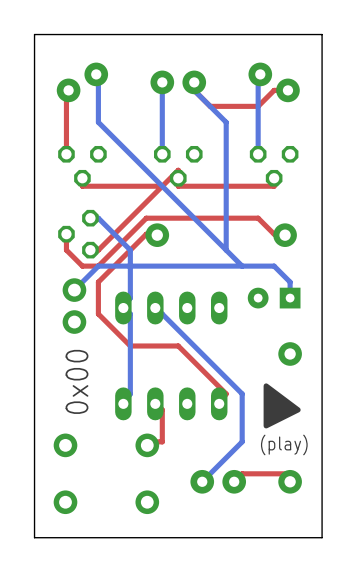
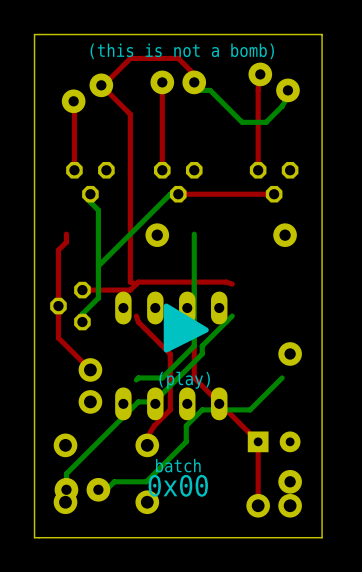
text: none -> (this is not a bomb) (182, 51)
bottom track: (96, 74) (98, 74) (98, 122) (242, 266) -> none
bottom track: (260, 74) (258, 74) (258, 154) -> none
part position: (82, 82) -> (87, 93)
bottom track: (162, 82) (162, 154) -> none
top track: none -> (194, 82) (194, 74) (178, 58) (130, 58) (101, 85) (130, 114) (130, 282) (136, 284)
bottom track: (194, 82) (194, 90) (226, 122) (226, 250) -> none
top track: none -> (258, 83) (258, 170)
top track: (68, 90) (66, 90) (66, 154) -> none
top track: none -> (162, 90) (162, 170)
bottom track: none -> (194, 90) (210, 90) (242, 122) (266, 122) (282, 106) (286, 99)
top track: (290, 90) (274, 90) (258, 106) (210, 106) (194, 90) -> none
top track: none -> (73, 101) (74, 170)
part position: (82, 166) -> (90, 182)
part position: (178, 166) -> (178, 182)
part position: (274, 166) -> (274, 182)
top track: (82, 178) (82, 186) (162, 186) -> none
top track: (274, 178) (274, 186) (178, 186) (178, 170) (98, 250) (90, 250) -> none
bottom track: none -> (90, 194) (90, 202) (98, 210) (98, 298) (82, 314) (82, 322)
bottom track: none -> (178, 194) (170, 194) (98, 266)
top track: none -> (274, 194) (178, 194)
bottom track: (90, 218) (98, 218) (130, 250) (130, 298) (123, 308) (130, 314) (130, 393) (123, 403) -> none
part: (78, 234) -> none
bottom track: none -> (194, 234) (194, 346) (162, 377) (138, 377) (136, 379)
top track: (157, 235) (146, 234) (98, 282) (98, 314) (130, 346) (178, 346) (226, 393) (219, 403) -> none
top track: (285, 235) (274, 234) (258, 218) (146, 218) (98, 266) (82, 266) (66, 250) (66, 242) -> (90, 369) (58, 338) (58, 250) (66, 242)
part footprint: [62, 278, 87, 334] -> [50, 281, 91, 331]
top track: none -> (194, 282) (194, 377) (258, 441) (258, 505)
top track: none -> (136, 284) (130, 290) (82, 290)
top track: none -> (232, 284) (226, 282) (138, 282) (136, 284)
bottom track: (74, 290) (98, 266) (274, 266) (290, 282) (290, 298) -> none
part rotation: 0° (274, 298) -> 180° (274, 441)
part position: (274, 298) -> (274, 441)
drawing: none -> [163, 303, 209, 353]
bottom track: (155, 308) (242, 393) (242, 441) (202, 481) -> none
top track: none -> (136, 316) (138, 322) (170, 353) (170, 409) (149, 432)
bottom track: none -> (232, 316) (202, 346) (202, 353) (154, 401) (138, 401) (66, 473) (66, 489)
bottom track: none -> (282, 377) (250, 409) (202, 409) (186, 425) (186, 441) (146, 481) (114, 481) (106, 489) (98, 489)
text rotation: 0° (77, 381) -> 90° clockwise (178, 485)
text position: 0x00 (77, 381) -> 0x00 (178, 485)
drawing: [263, 383, 301, 429] -> none
part: none -> (90, 385)
top track: (155, 403) (162, 409) (162, 441) (146, 441) (147, 445) -> none
text position: (play) (284, 444) -> (play) (184, 380)
text: none -> batch (178, 465)
part position: (218, 481) -> (82, 489)
top track: (290, 481) (290, 473) (242, 473) (234, 481) -> none
part: none -> (274, 505)

